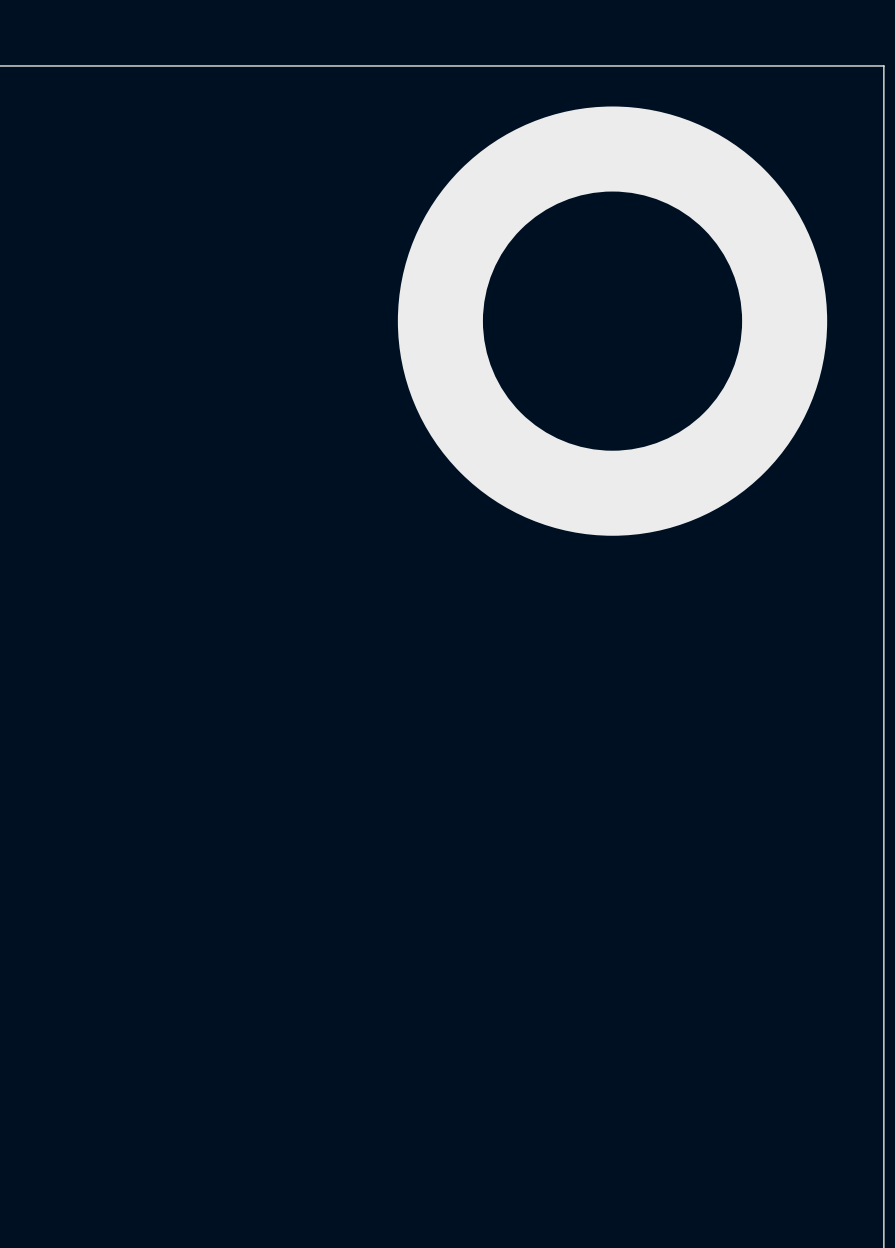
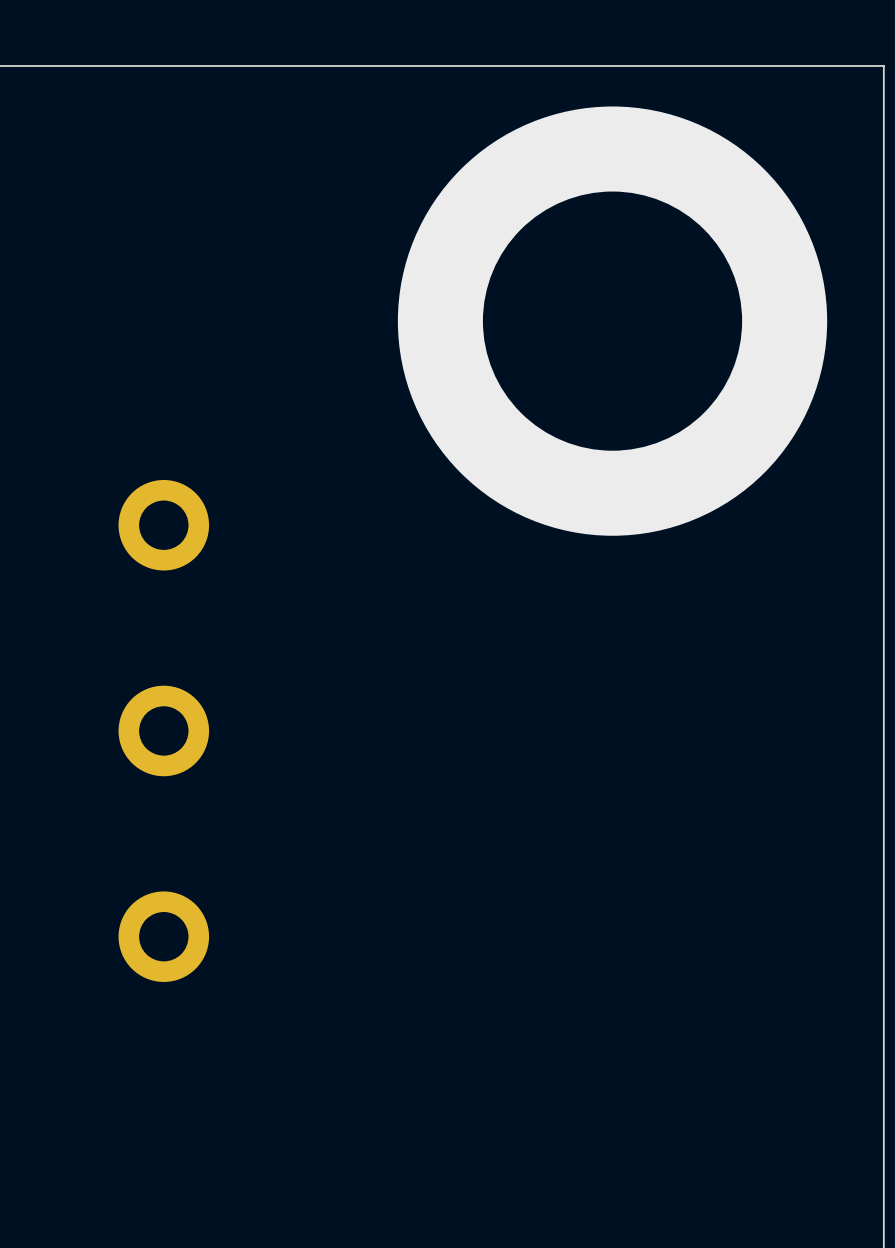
part: none -> (163, 730)

